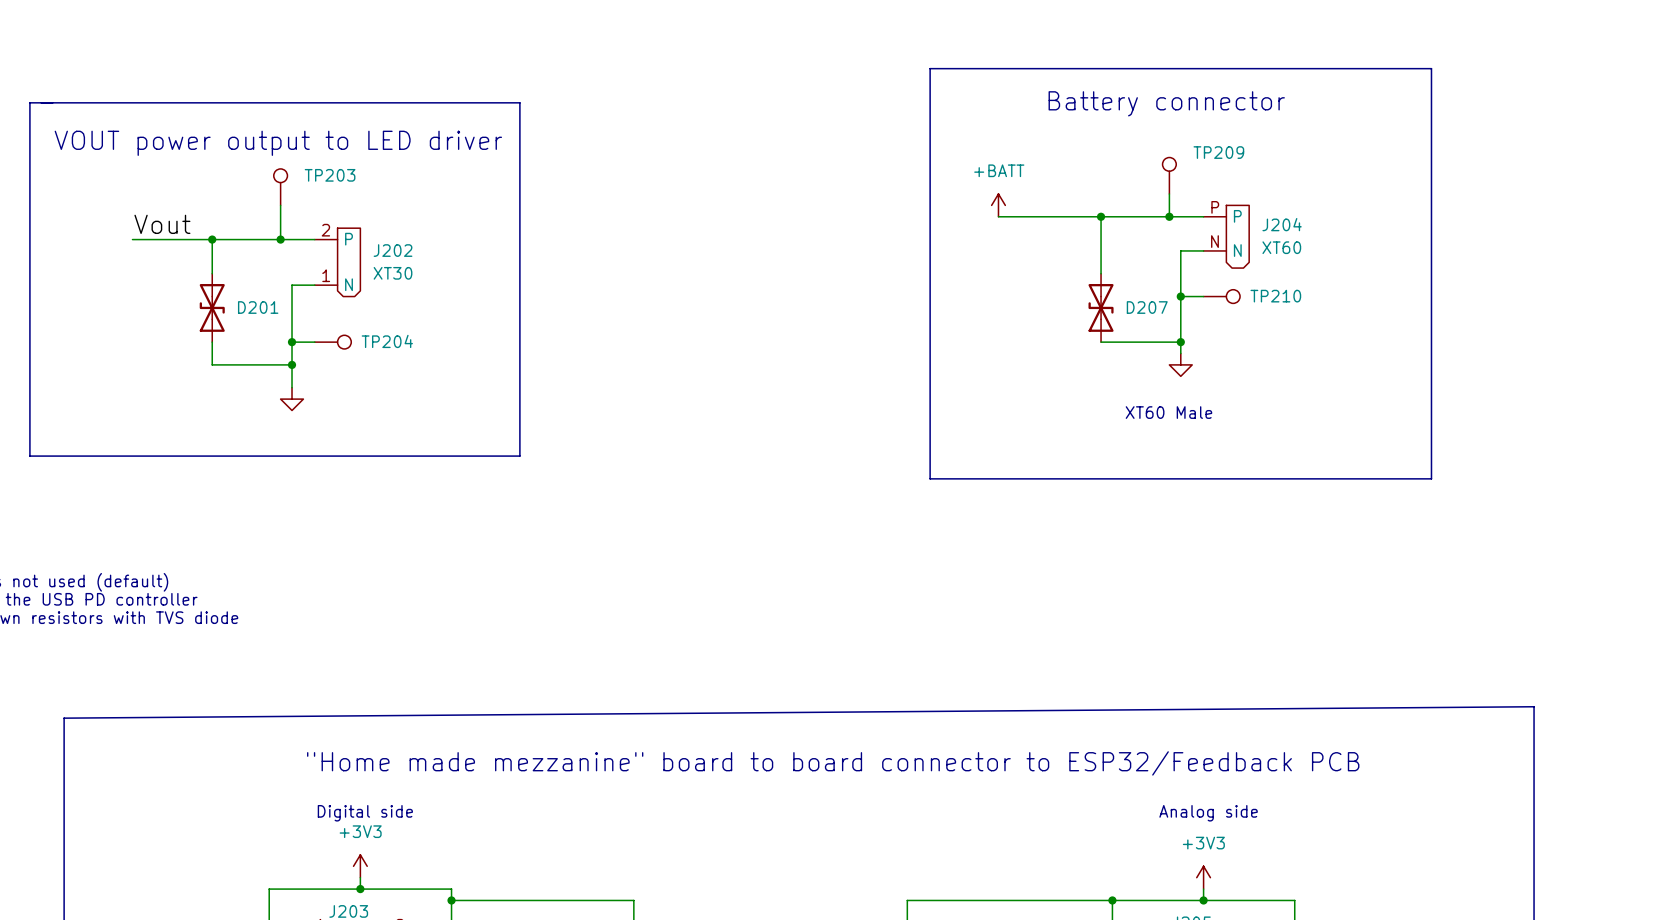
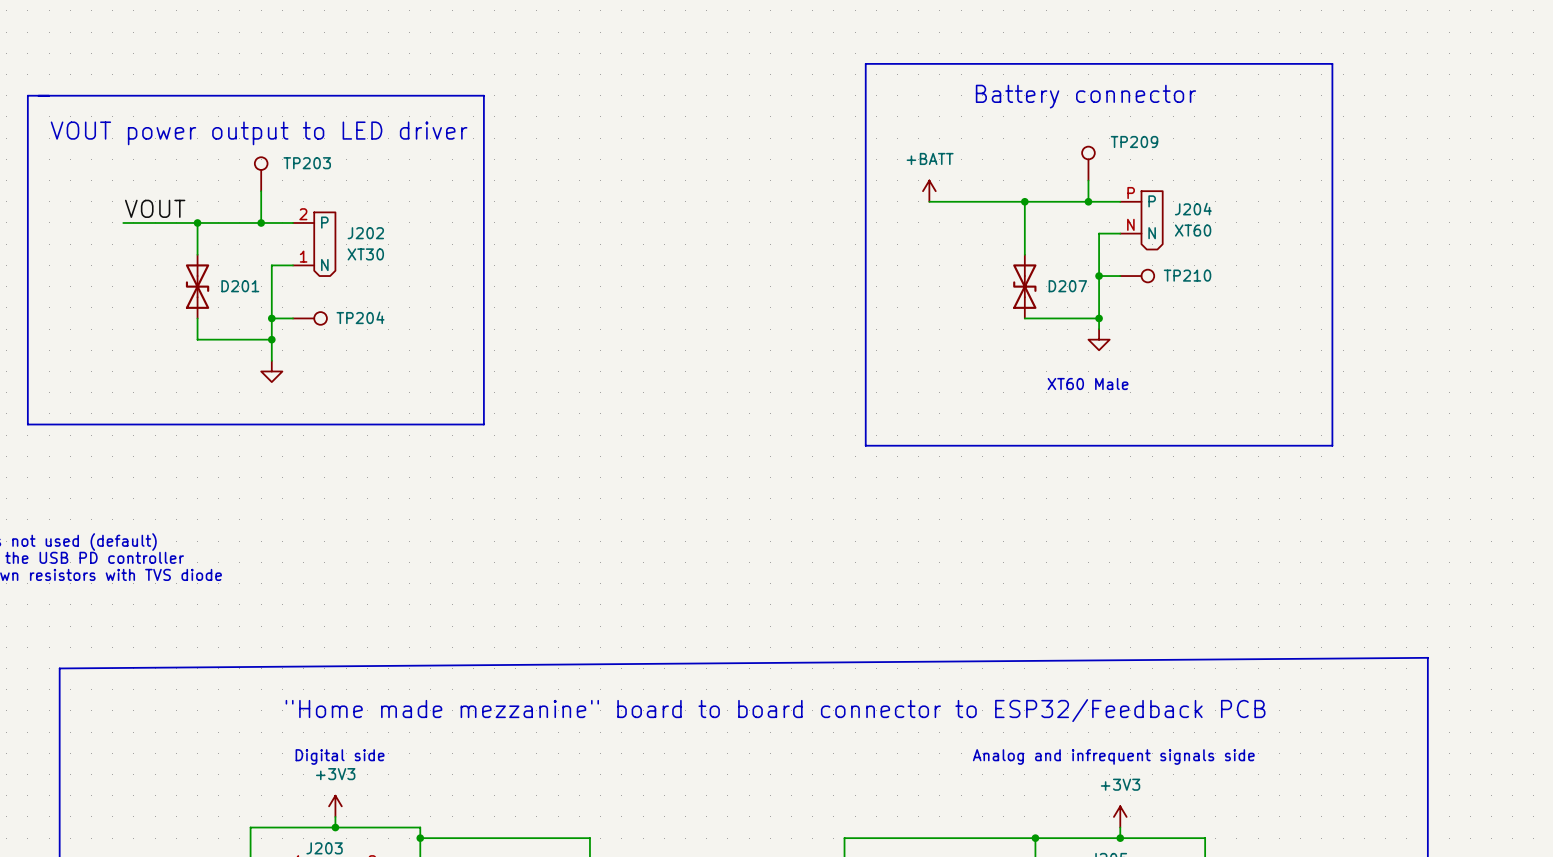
label: Vout (162, 224) -> VOUT (155, 208)
text: none -> Analog and infrequent signals side (1113, 756)
text: Analog side (1208, 813) -> none

